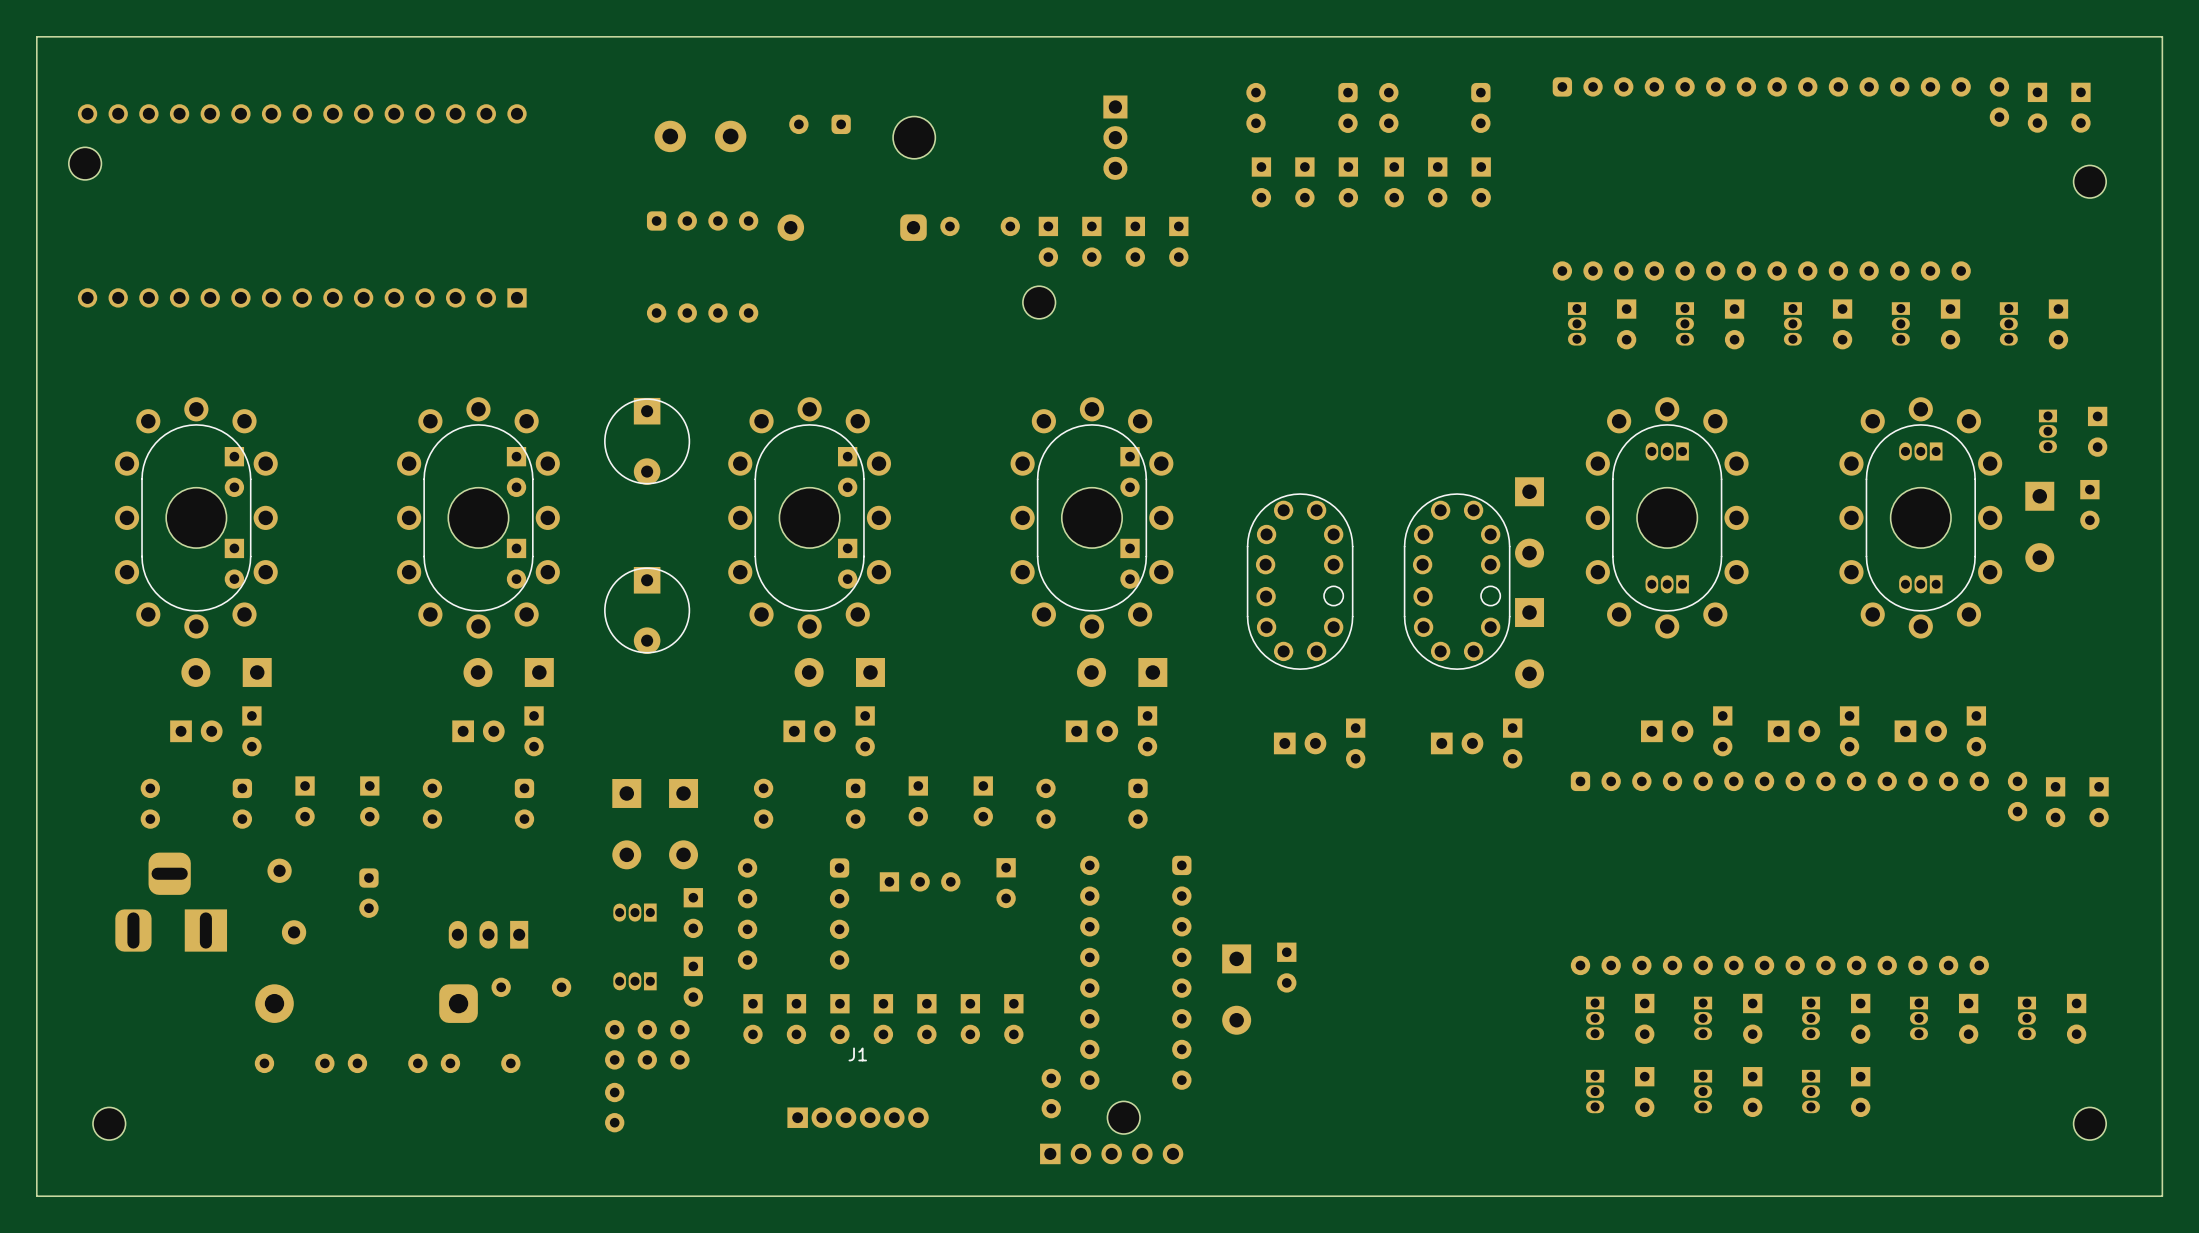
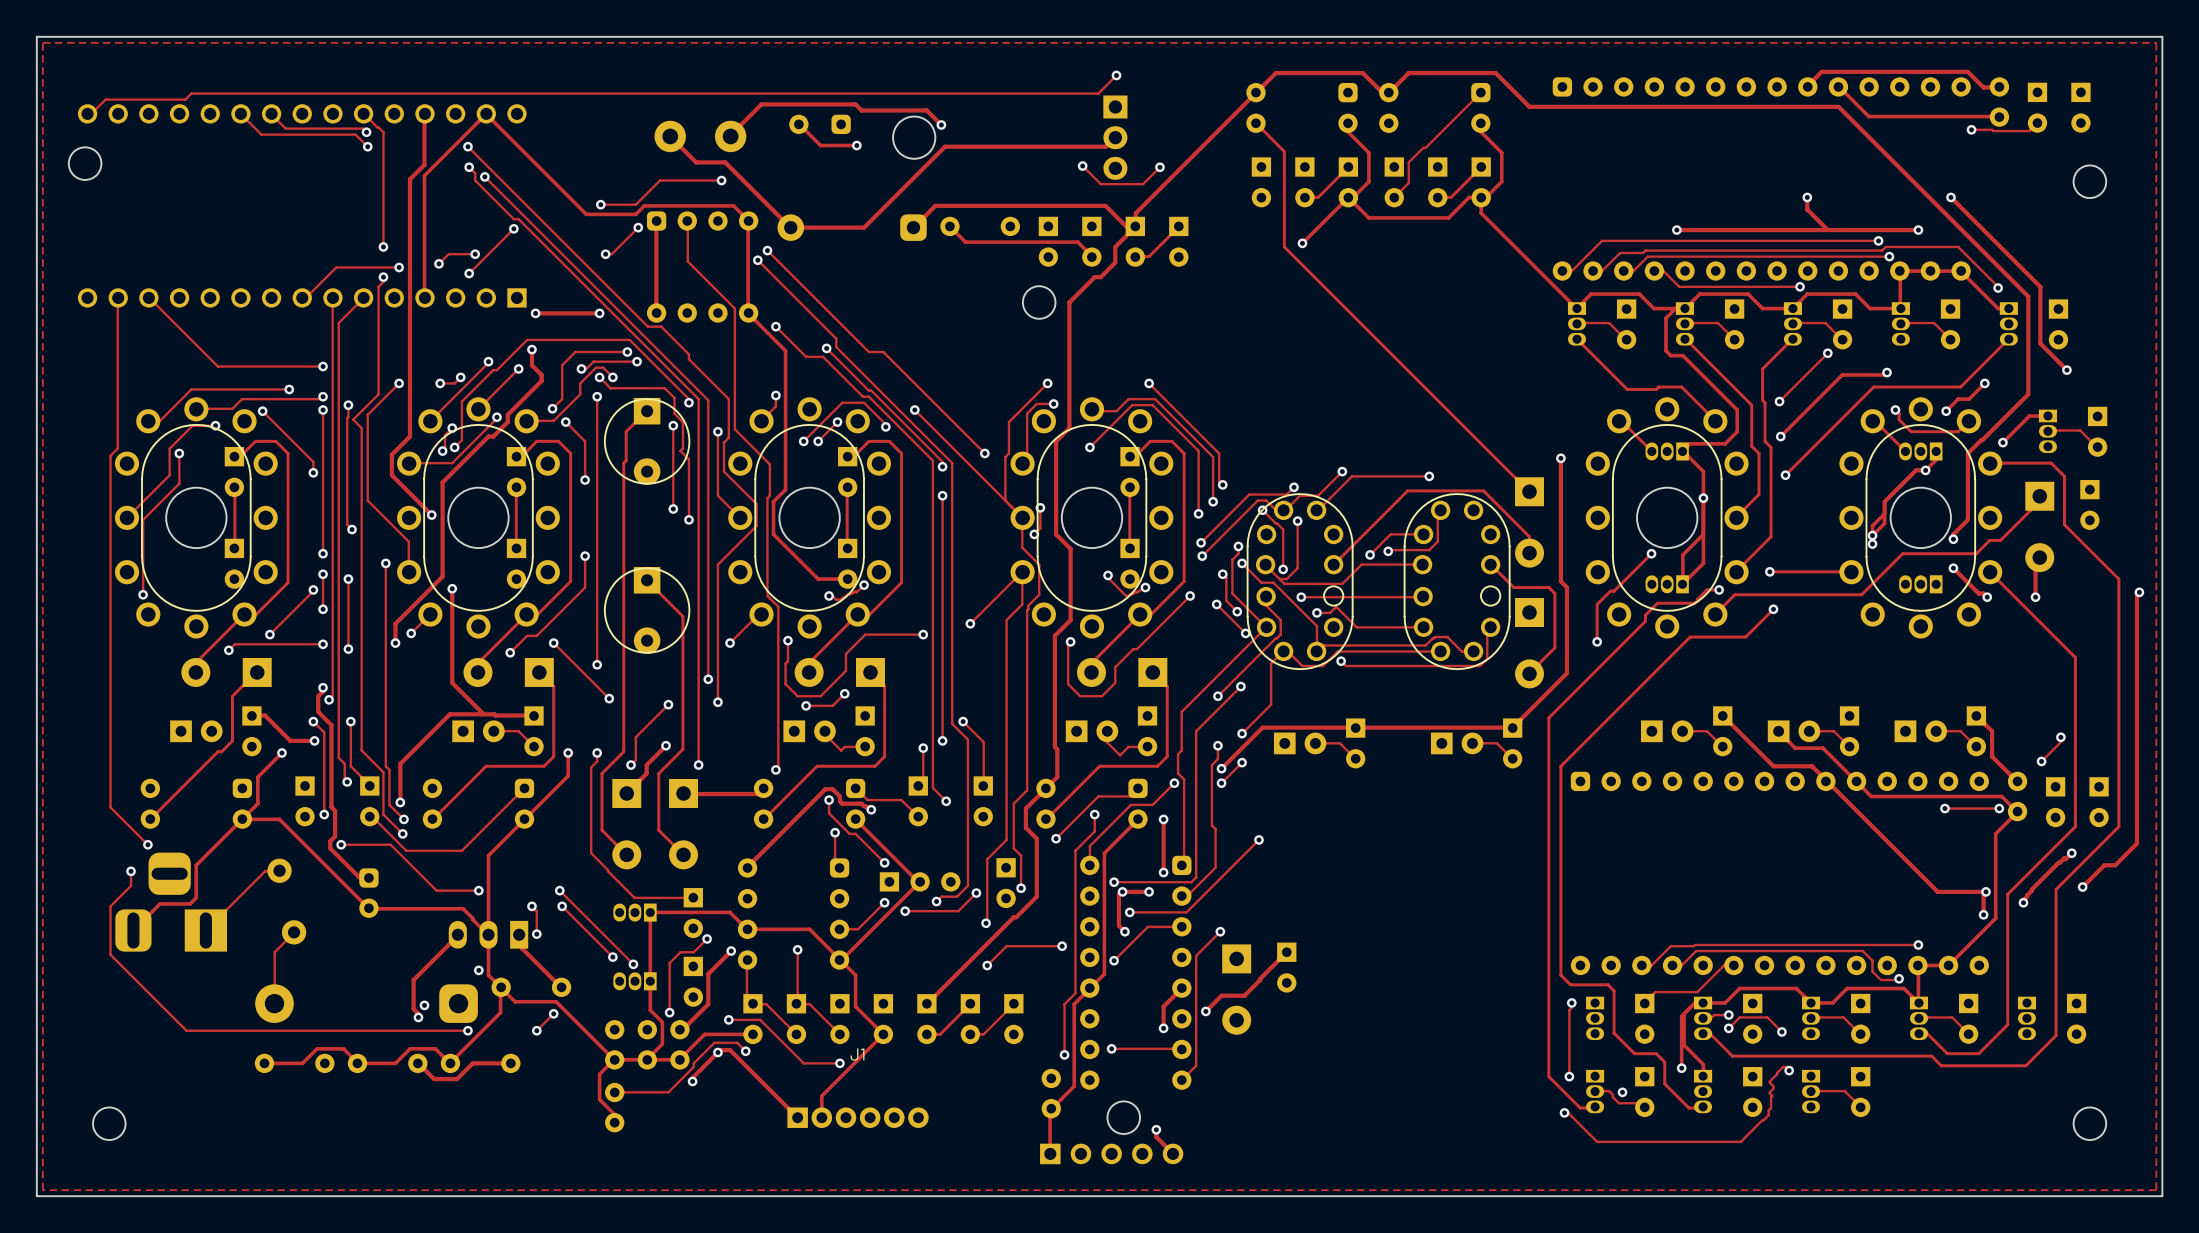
zone outline: none -> (42, 42) (2156, 42) (2156, 1190) (42, 1190) (42, 42)
track: none -> (1116, 75) (1098, 93) (191, 93) (185, 99) (105, 99) (91, 114) (87, 113)
via: none -> (1116, 75)
track: none -> (1807, 86) (1821, 71) (1967, 71) (1983, 87) (1999, 86)
track: none -> (1838, 86) (1868, 116) (1999, 117)
track: none -> (1480, 92) (1408, 162) (1408, 182) (1394, 197)
track: none -> (240, 113) (261, 134) (355, 134) (367, 146)
track: none -> (271, 113) (285, 128) (362, 128) (366, 132)
track: none -> (363, 113) (383, 132) (383, 246)
track: none -> (424, 113) (424, 164) (410, 179) (410, 436) (391, 454) (391, 475) (431, 515)
track: none -> (486, 113) (424, 175) (424, 297)
track: none -> (486, 114) (586, 214) (635, 214) (644, 205) (733, 205) (742, 214) (748, 220) (748, 313) (785, 350) (785, 489) (773, 501) (773, 534) (818, 579) (847, 579)
track: none -> (1255, 123) (1284, 151) (1284, 246) (1529, 491)
track: none -> (1348, 123) (1348, 132) (1368, 152) (1368, 181) (1356, 193) (1348, 197) (1368, 217) (1448, 217) (1469, 197) (1481, 197) (1481, 213) (1576, 308) (1591, 294) (1639, 294) (1653, 308) (1685, 308)
track: none -> (1480, 123) (1481, 132) (1501, 152) (1501, 181) (1489, 193) (1481, 197)
track: none -> (2037, 123) (2029, 131) (1971, 129)
track: none -> (798, 124) (820, 145) (856, 145)
track: none -> (941, 124) (926, 110) (861, 110) (855, 104) (761, 104) (730, 136)
via: none -> (941, 124)
via: none -> (1971, 129)
via: none -> (366, 132)
track: none -> (670, 136) (696, 162) (725, 162) (790, 227) (864, 227) (945, 146) (1105, 146) (1115, 137)
via: none -> (856, 145)
via: none -> (367, 146)
track: none -> (467, 146) (647, 326) (661, 326) (688, 354) (688, 359) (728, 399) (728, 437) (723, 442) (723, 471) (756, 504) (756, 525) (717, 564) (717, 702)
via: none -> (467, 146)
track: none -> (1082, 166) (1100, 184) (1143, 184) (1159, 167)
via: none -> (1082, 166)
track: none -> (469, 167) (475, 173) (475, 180) (513, 219) (518, 219) (698, 399) (698, 765)
via: none -> (469, 167)
via: none -> (1159, 167)
track: none -> (1348, 167) (1318, 197) (1304, 197)
track: none -> (1481, 167) (1451, 197) (1437, 197)
track: none -> (484, 176) (708, 400) (708, 679)
via: none -> (484, 176)
track: none -> (721, 180) (659, 180) (635, 204) (600, 204)
via: none -> (721, 180)
track: none -> (1348, 197) (1302, 243)
track: none -> (1807, 197) (1807, 209) (1826, 230)
via: none -> (1807, 197)
track: none -> (1951, 197) (2040, 286) (2040, 343) (2066, 370)
via: none -> (1951, 197)
via: none -> (600, 204)
track: none -> (656, 220) (656, 313)
track: none -> (687, 220) (687, 261) (734, 308) (734, 429) (769, 464) (769, 495) (767, 498) (767, 595) (778, 606) (778, 767) (775, 769)
track: none -> (949, 226) (965, 242) (1077, 242) (1091, 257)
track: none -> (1135, 226) (1126, 226) (1105, 205) (935, 205) (913, 227)
track: none -> (1178, 226) (1149, 256) (1135, 257)
track: none -> (638, 227) (611, 254) (605, 254)
via: none -> (638, 227)
track: none -> (513, 228) (469, 273)
via: none -> (513, 228)
track: none -> (1676, 230) (1918, 230)
via: none -> (1676, 230)
via: none -> (1918, 230)
track: none -> (1878, 240) (1601, 240) (1571, 271) (1562, 270)
via: none -> (1878, 240)
via: none -> (1302, 243)
via: none -> (383, 246)
track: none -> (767, 250) (868, 352) (883, 352) (984, 453)
via: none -> (767, 250)
track: none -> (475, 254) (448, 254) (438, 263)
via: none -> (475, 254)
via: none -> (605, 254)
track: none -> (1889, 256) (1647, 256) (1633, 271) (1623, 271)
via: none -> (1889, 256)
track: none -> (757, 260) (836, 338) (836, 347) (952, 463) (952, 723) (967, 739) (967, 885) (957, 896) (941, 896) (936, 901)
via: none -> (757, 260)
via: none -> (438, 263)
track: none -> (399, 267) (336, 267) (306, 297) (302, 297)
via: none -> (399, 267)
track: none -> (1593, 270) (1601, 271) (1620, 253) (1643, 253) (1645, 250) (1882, 250) (1885, 246) (1958, 246) (1998, 288)
track: none -> (1654, 270) (1663, 271) (1679, 286) (1800, 286)
track: none -> (1930, 270) (1961, 270) (1998, 308) (2008, 308)
track: none -> (1930, 271) (1899, 270) (1900, 308) (1870, 308) (1855, 294) (1807, 294) (1792, 308) (1762, 308) (1748, 294) (1699, 294) (1684, 308) (1676, 307) (1665, 318) (1665, 350) (1670, 355) (1682, 355) (1737, 410) (1737, 431) (1725, 443) (1690, 443) (1682, 451) (1703, 471) (1703, 563) (1682, 584) (1682, 554) (1703, 534)
via: none -> (469, 273)
track: none -> (383, 277) (383, 281) (378, 286) (378, 394) (353, 419) (361, 428) (361, 750) (383, 772) (383, 814) (402, 833)
via: none -> (383, 277)
via: none -> (1800, 286)
via: none -> (1998, 288)
track: none -> (118, 297) (117, 448) (110, 455) (110, 807) (147, 844)
track: none -> (148, 297) (217, 366) (323, 366)
track: none -> (332, 297) (332, 696) (329, 699)
track: none -> (363, 297) (338, 323) (338, 757) (344, 763) (344, 779) (347, 781)
track: none -> (535, 313) (599, 313)
via: none -> (535, 313)
via: none -> (599, 313)
track: none -> (1576, 323) (1609, 323) (1626, 339)
track: none -> (1684, 323) (1717, 323) (1734, 339)
track: none -> (1792, 323) (1825, 323) (1842, 339)
track: none -> (1900, 323) (1934, 323) (1950, 339)
track: none -> (775, 326) (806, 356) (823, 356) (862, 396) (868, 396) (932, 460) (932, 788) (946, 801)
via: none -> (775, 326)
track: none -> (1576, 339) (1627, 389) (1681, 387) (1715, 421)
track: none -> (1684, 339) (1751, 405) (1751, 446) (1758, 453) (1758, 494) (1736, 517)
track: none -> (1792, 339) (1762, 368) (1765, 441) (1771, 447) (1771, 536) (1736, 572)
track: none -> (2008, 339) (1960, 387) (1873, 387) (1785, 475)
track: none -> (826, 348) (942, 461) (942, 466)
via: none -> (826, 348)
track: none -> (531, 349) (531, 365) (541, 374) (541, 381) (507, 414) (507, 422) (493, 436) (488, 436) (442, 482) (442, 576) (395, 623) (395, 643)
via: none -> (531, 349)
track: none -> (627, 352) (575, 352) (562, 365) (562, 399) (552, 408)
via: none -> (627, 352)
track: none -> (1827, 353) (1779, 401)
via: none -> (1827, 353)
track: none -> (488, 361) (430, 421)
via: none -> (488, 361)
track: none -> (637, 361) (593, 361) (586, 368) (581, 368)
via: none -> (637, 361)
via: none -> (323, 366)
track: none -> (518, 368) (478, 409)
via: none -> (518, 368)
via: none -> (581, 368)
via: none -> (2066, 370)
track: none -> (1887, 372) (1884, 374) (1842, 374) (1780, 436)
via: none -> (1887, 372)
track: none -> (460, 377) (454, 383) (440, 383)
via: none -> (460, 377)
track: none -> (599, 377) (610, 388) (664, 388) (674, 397) (674, 413) (682, 422) (682, 448) (680, 451) (688, 459) (688, 519)
via: none -> (599, 377)
track: none -> (612, 377) (603, 367) (595, 367) (580, 383) (580, 394) (553, 420) (526, 421)
via: none -> (612, 377)
track: none -> (399, 383) (367, 414) (367, 500) (408, 541) (409, 572)
via: none -> (399, 383)
via: none -> (440, 383)
track: none -> (1047, 383) (1009, 422) (1009, 453) (1005, 457) (1005, 500)
via: none -> (1047, 383)
track: none -> (1149, 383) (1219, 453) (1219, 481) (1222, 484)
via: none -> (1149, 383)
track: none -> (1984, 383) (1969, 399) (1958, 399) (1946, 411)
via: none -> (1984, 383)
track: none -> (289, 389) (191, 389) (160, 420) (148, 421)
via: none -> (289, 389)
track: none -> (775, 395) (775, 406) (761, 421)
via: none -> (775, 395)
track: none -> (323, 396) (320, 399) (242, 399) (232, 408) (196, 409)
via: none -> (323, 396)
track: none -> (597, 396) (597, 664)
via: none -> (597, 396)
via: none -> (1779, 401)
track: none -> (688, 402) (688, 399) (629, 339) (527, 339) (461, 401) (461, 440) (454, 447)
via: none -> (688, 402)
track: none -> (1053, 403) (1036, 403) (1027, 413) (1027, 458) (1022, 463)
via: none -> (1053, 403)
track: none -> (348, 405) (347, 524) (352, 529)
via: none -> (348, 405)
via: none -> (552, 408)
track: none -> (1091, 409) (1094, 411) (1116, 411) (1128, 399) (1155, 399) (1213, 457) (1213, 501)
track: none -> (323, 410) (323, 553)
via: none -> (323, 410)
track: none -> (914, 410) (1015, 510) (1022, 517) (1022, 547) (1039, 564) (1039, 594) (1028, 605) (1027, 610) (1027, 790) (1013, 803) (1013, 848) (1021, 855) (1021, 888)
via: none -> (914, 410)
track: none -> (1895, 410) (1899, 413) (1899, 419) (1911, 431) (1958, 431) (1968, 421)
via: none -> (1895, 410)
track: none -> (262, 411) (313, 461) (313, 472)
via: none -> (262, 411)
track: none -> (647, 411) (626, 431) (626, 460) (623, 463) (623, 751) (602, 773) (602, 830) (626, 854)
via: none -> (1946, 411)
track: none -> (2047, 415) (2029, 416) (2002, 442)
track: none -> (496, 417) (452, 463) (409, 463)
via: none -> (496, 417)
track: none -> (1619, 421) (1651, 451)
track: none -> (1872, 421) (1905, 451)
track: none -> (565, 422) (585, 441) (585, 480)
via: none -> (565, 422)
track: none -> (837, 422) (818, 441)
via: none -> (837, 422)
track: none -> (215, 425) (192, 425) (169, 448) (169, 475) (127, 517)
via: none -> (215, 425)
track: none -> (673, 425) (673, 509)
via: none -> (673, 425)
track: none -> (885, 426) (885, 424) (864, 402) (842, 402) (803, 441)
via: none -> (885, 426)
track: none -> (452, 428) (445, 435) (445, 448) (442, 451)
via: none -> (452, 428)
track: none -> (717, 431) (717, 495) (740, 517)
via: none -> (717, 431)
track: none -> (2047, 431) (2080, 430) (2097, 447)
via: none -> (1780, 436)
via: none -> (803, 441)
via: none -> (818, 441)
via: none -> (2002, 442)
via: none -> (454, 447)
track: none -> (1089, 447) (1132, 405) (1152, 405) (1198, 451) (1198, 513)
via: none -> (1089, 447)
via: none -> (442, 451)
track: none -> (1936, 451) (1936, 459) (1925, 470) (1915, 470) (1884, 501) (1884, 523) (1872, 535)
track: none -> (179, 453) (179, 483) (143, 519) (143, 594)
via: none -> (179, 453)
via: none -> (984, 453)
track: none -> (234, 456) (239, 457) (255, 441) (275, 441) (288, 453) (288, 582) (255, 615) (244, 614) (199, 658) (195, 672)
track: none -> (516, 456) (521, 457) (536, 441) (558, 441) (570, 453) (570, 581) (538, 614) (526, 614) (482, 658) (477, 672)
track: none -> (847, 456) (853, 457) (868, 441) (889, 441) (901, 453) (901, 582) (868, 615) (858, 614) (813, 658) (809, 672)
track: none -> (1130, 456) (1134, 457) (1150, 441) (1172, 441) (1184, 453) (1184, 581) (1151, 614) (1140, 614) (1095, 658) (1091, 672)
track: none -> (1560, 458) (1560, 581) (1566, 587) (1566, 673) (1512, 728) (1262, 727) (1221, 768)
via: none -> (1560, 458)
track: none -> (1990, 463) (2051, 463) (2064, 476) (2064, 524) (2118, 579) (2118, 826) (2056, 889) (2056, 1035) (2025, 1065) (1941, 1065) (1931, 1056) (1732, 1056) (1709, 1033) (1703, 1033)
via: none -> (942, 466)
via: none -> (1925, 470)
track: none -> (1342, 471) (1318, 495) (1300, 495) (1283, 510) (1275, 510) (1266, 500) (1257, 500) (1202, 556)
via: none -> (1342, 471)
via: none -> (313, 472)
via: none -> (1785, 475)
track: none -> (1429, 476) (1351, 476) (1316, 510)
via: none -> (1429, 476)
via: none -> (585, 480)
via: none -> (1222, 484)
track: none -> (234, 487) (234, 548)
track: none -> (516, 487) (516, 548)
track: none -> (847, 487) (847, 548)
track: none -> (1130, 487) (1130, 548)
track: none -> (1294, 487) (1286, 494) (1249, 494) (1201, 542)
via: none -> (1294, 487)
track: none -> (942, 495) (942, 740)
via: none -> (942, 495)
track: none -> (2039, 496) (2030, 510) (2000, 540) (1989, 540) (1976, 553) (1902, 553) (1861, 594) (1734, 594) (1715, 614)
via: none -> (1703, 498)
via: none -> (1213, 501)
track: none -> (1040, 507) (1040, 528) (1034, 534)
via: none -> (1040, 507)
via: none -> (673, 509)
track: none -> (1262, 510) (1283, 529) (1283, 569)
via: none -> (1262, 510)
track: none -> (1440, 510) (1437, 512) (1437, 541) (1429, 550) (1388, 551)
via: none -> (1198, 513)
track: none -> (1884, 513) (1872, 525) (1872, 544)
via: none -> (431, 515)
via: none -> (688, 519)
track: none -> (1297, 521) (1297, 568) (1286, 579) (1280, 579)
via: none -> (1297, 521)
via: none -> (352, 529)
via: none -> (1034, 534)
track: none -> (1423, 534) (1390, 534) (1370, 554)
via: none -> (1872, 535)
track: none -> (1953, 539) (1953, 534) (1967, 519) (1967, 453) (2028, 394) (2028, 296) (1838, 106) (1529, 106) (1495, 73) (1408, 73) (1395, 86) (1388, 92) (1382, 92) (1362, 73) (1275, 73) (1135, 213) (1135, 226) (1115, 246) (1115, 262) (1100, 277) (1094, 277) (1069, 302) (1069, 428) (1056, 441) (1056, 534) (1070, 548) (1070, 620) (1054, 635) (1054, 746) (1057, 749) (1057, 777) (1025, 808) (1025, 827) (1036, 838) (1036, 896) (926, 1003)
via: none -> (1953, 539)
via: none -> (1201, 542)
via: none -> (1872, 544)
track: none -> (1238, 546) (1238, 553) (1232, 559) (1232, 593) (1266, 627) (1181, 711) (1181, 750) (1178, 754) (1178, 773) (1184, 779) (1184, 856) (1181, 865)
via: none -> (1238, 546)
via: none -> (1388, 551)
via: none -> (323, 553)
track: none -> (1529, 553) (1529, 536) (1483, 490) (1407, 490) (1333, 564)
track: none -> (1651, 553) (1614, 591) (1610, 591) (1597, 604) (1597, 641)
via: none -> (1651, 553)
via: none -> (1370, 554)
track: none -> (585, 556) (585, 587) (536, 635) (527, 635) (510, 652)
via: none -> (585, 556)
via: none -> (1202, 556)
track: none -> (2039, 557) (2035, 560) (2035, 597)
track: none -> (385, 563) (385, 766) (389, 769) (389, 804) (403, 819)
via: none -> (385, 563)
track: none -> (1242, 563) (1261, 582) (1273, 582) (1316, 626) (1316, 651) (1324, 645) (1425, 645) (1435, 637) (1447, 637) (1461, 651) (1473, 651)
via: none -> (1242, 563)
track: none -> (1265, 564) (1284, 583) (1342, 583) (1361, 564) (1422, 564)
track: none -> (1490, 564) (1513, 587) (1548, 587) (1554, 593) (1554, 647) (1529, 673)
track: none -> (1953, 568) (1978, 593) (1983, 593) (1987, 597)
via: none -> (1953, 568)
via: none -> (1283, 569)
track: none -> (1769, 571) (1851, 572)
via: none -> (1769, 571)
track: none -> (1990, 572) (2075, 657) (2075, 826) (2007, 894) (2007, 1024) (1978, 1053) (1947, 1053) (1926, 1033) (1919, 1033)
track: none -> (323, 574) (323, 609)
via: none -> (323, 574)
track: none -> (1222, 574) (1226, 577) (1226, 600) (1237, 611)
via: none -> (1222, 574)
track: none -> (1108, 575) (1108, 577) (1126, 595) (1139, 591) (1144, 586) (1145, 587)
via: none -> (1108, 575)
track: none -> (348, 579) (348, 649)
via: none -> (348, 579)
track: none -> (647, 580) (682, 616) (682, 749) (658, 773) (658, 830) (683, 854)
track: none -> (864, 585) (856, 592) (847, 594) (841, 599) (829, 595)
via: none -> (864, 585)
via: none -> (1145, 587)
track: none -> (452, 588) (452, 682) (482, 714)
via: none -> (452, 588)
track: none -> (313, 589) (269, 634)
via: none -> (313, 589)
track: none -> (1719, 589) (1707, 589) (1694, 603) (1657, 603) (1645, 615) (1645, 621) (1548, 717) (1548, 1076) (1580, 1108) (1595, 1106)
via: none -> (1719, 589)
track: none -> (2139, 592) (2136, 594) (2136, 843) (2115, 865) (2104, 865) (2082, 887)
via: none -> (2139, 592)
via: none -> (143, 594)
via: none -> (829, 595)
track: none -> (1190, 595) (1137, 649) (1133, 649) (1115, 667) (1115, 682) (1102, 696) (1080, 696) (1068, 684) (1068, 644) (1070, 641)
via: none -> (1190, 595)
track: none -> (1266, 596) (1266, 605) (1280, 620) (1280, 634) (1217, 696)
track: none -> (1423, 596) (1301, 597)
via: none -> (1301, 597)
via: none -> (1987, 597)
via: none -> (2035, 597)
track: none -> (1216, 604) (1245, 633)
via: none -> (1216, 604)
via: none -> (323, 609)
track: none -> (1773, 609) (1745, 637) (1690, 637) (1560, 766) (1560, 975) (1570, 984) (1608, 984) (1614, 990) (1614, 1033) (1634, 1053) (1656, 1053) (1664, 1062) (1664, 1083) (1688, 1108) (1703, 1106)
via: none -> (1773, 609)
via: none -> (1237, 611)
track: none -> (1316, 612) (1330, 612) (1336, 606) (1356, 627) (1423, 627)
via: none -> (1316, 612)
track: none -> (430, 614) (411, 633)
track: none -> (761, 614) (730, 643)
track: none -> (970, 623) (1022, 571) (1022, 604) (1006, 620) (1006, 839) (987, 859) (986, 923)
via: none -> (970, 623)
track: none -> (1490, 627) (1487, 631) (1487, 658) (1480, 666) (1345, 666) (1341, 661)
via: none -> (411, 633)
via: none -> (1245, 633)
via: none -> (269, 634)
track: none -> (923, 634) (865, 634) (845, 653) (845, 670) (820, 696) (797, 696) (785, 684) (788, 640)
via: none -> (923, 634)
via: none -> (788, 640)
via: none -> (1070, 641)
via: none -> (1597, 641)
via: none -> (395, 643)
track: none -> (553, 643) (609, 698)
via: none -> (553, 643)
via: none -> (730, 643)
track: none -> (323, 644) (234, 644) (228, 650)
via: none -> (323, 644)
via: none -> (348, 649)
via: none -> (228, 650)
track: none -> (1440, 651) (1337, 651) (1323, 666) (1302, 666) (1291, 655) (1283, 651) (1271, 663) (1271, 704) (1242, 733)
via: none -> (510, 652)
via: none -> (1341, 661)
via: none -> (597, 664)
track: none -> (257, 672) (232, 696) (232, 740) (221, 751) (217, 751) (150, 819)
track: none -> (539, 672) (553, 686) (553, 756) (544, 766) (486, 766) (432, 819)
track: none -> (870, 672) (884, 686) (884, 756) (874, 766) (816, 766) (763, 819)
track: none -> (1152, 672) (1167, 686) (1167, 756) (1157, 766) (1099, 766) (1045, 819)
via: none -> (708, 679)
track: none -> (1240, 686) (1196, 731) (1196, 877) (1191, 882) (1114, 882)
via: none -> (1240, 686)
track: none -> (323, 687) (323, 691) (318, 696) (318, 711) (331, 725) (331, 807) (335, 810) (335, 836) (330, 841) (330, 848) (359, 877) (368, 878)
via: none -> (323, 687)
track: none -> (844, 693) (832, 705) (806, 705)
via: none -> (844, 693)
via: none -> (1217, 696)
via: none -> (609, 698)
via: none -> (329, 699)
via: none -> (717, 702)
track: none -> (668, 704) (635, 737) (635, 760) (631, 765)
via: none -> (668, 704)
via: none -> (806, 705)
track: none -> (251, 715) (265, 715) (290, 740) (314, 740)
track: none -> (534, 715) (449, 714) (400, 763) (400, 802)
track: none -> (1722, 715) (1773, 766) (1812, 766) (1937, 891) (1986, 891) (1983, 895) (1983, 914)
track: none -> (1976, 715) (1992, 731) (1992, 756) (2017, 781)
track: none -> (313, 721) (324, 732) (324, 814)
via: none -> (313, 721)
track: none -> (350, 721) (350, 766) (369, 786)
via: none -> (350, 721)
track: none -> (963, 721) (983, 742) (983, 786)
via: none -> (963, 721)
track: none -> (493, 731) (518, 731) (534, 746)
track: none -> (824, 731) (841, 750) (844, 746) (865, 746)
track: none -> (1107, 731) (1106, 742) (1120, 755) (1128, 746) (1147, 746)
track: none -> (1682, 731) (1707, 731) (1722, 746)
track: none -> (1778, 731) (1795, 748) (1822, 748) (1871, 796) (2001, 796) (2017, 811) (1995, 833) (1995, 918) (1948, 965)
track: none -> (1809, 731) (1833, 731) (1849, 746)
track: none -> (1936, 731) (1960, 731) (1976, 746)
via: none -> (1242, 733)
track: none -> (2060, 737) (2060, 742) (2041, 761)
via: none -> (2060, 737)
via: none -> (314, 740)
via: none -> (942, 740)
track: none -> (1315, 743) (1339, 743) (1355, 758)
track: none -> (1472, 743) (1496, 743) (1512, 758)
track: none -> (666, 745) (646, 765) (646, 773) (626, 793)
via: none -> (666, 745)
track: none -> (1217, 745) (1217, 759) (1211, 765) (1211, 825) (1215, 829) (1215, 867) (1190, 893) (1181, 896)
via: none -> (1217, 745)
track: none -> (923, 748) (923, 777) (918, 786)
via: none -> (923, 748)
track: none -> (281, 752) (257, 777) (257, 803) (242, 819)
via: none -> (281, 752)
track: none -> (568, 752) (568, 775) (488, 855) (488, 975) (501, 987)
via: none -> (568, 752)
track: none -> (597, 752) (597, 761) (591, 767) (591, 853) (634, 897) (693, 897)
via: none -> (597, 752)
via: none -> (2041, 761)
track: none -> (1242, 762) (1221, 783)
via: none -> (1242, 762)
via: none -> (631, 765)
via: none -> (698, 765)
via: none -> (1221, 768)
via: none -> (775, 769)
via: none -> (347, 781)
track: none -> (1174, 783) (1152, 804) (1130, 804) (1089, 845) (1089, 865)
via: none -> (1174, 783)
via: none -> (1221, 783)
track: none -> (524, 788) (461, 850) (406, 850) (369, 816)
track: none -> (763, 788) (756, 794) (683, 793)
track: none -> (855, 788) (867, 800) (901, 800) (918, 816)
track: none -> (1137, 788) (1129, 796) (1098, 796) (1056, 838)
track: none -> (829, 800) (829, 813) (849, 833) (855, 833) (884, 862)
via: none -> (829, 800)
via: none -> (946, 801)
via: none -> (400, 802)
track: none -> (1944, 808) (1999, 808)
via: none -> (1944, 808)
via: none -> (1999, 808)
track: none -> (871, 809) (861, 803) (842, 803) (839, 801) (839, 796) (832, 789) (825, 789) (747, 868)
via: none -> (871, 809)
via: none -> (324, 814)
track: none -> (1094, 814) (1094, 831) (1075, 850) (1075, 993) (1064, 1004) (1064, 1054)
via: none -> (1094, 814)
track: none -> (242, 819) (196, 865) (196, 897) (190, 903) (160, 903) (133, 930)
track: none -> (242, 819) (279, 819) (368, 908) (463, 908) (488, 935)
via: none -> (403, 819)
track: none -> (855, 819) (920, 881) (839, 960)
track: none -> (1137, 819) (1104, 853) (1104, 973) (1074, 1004) (1074, 1086) (1051, 1108) (1050, 1153)
track: none -> (1163, 819) (1163, 872)
via: none -> (1163, 819)
track: none -> (835, 832) (835, 859) (839, 868)
via: none -> (835, 832)
via: none -> (402, 833)
via: none -> (1056, 838)
track: none -> (1259, 839) (1186, 912) (1129, 912)
via: none -> (1259, 839)
via: none -> (147, 844)
track: none -> (341, 844) (390, 844) (436, 890) (478, 890)
via: none -> (341, 844)
track: none -> (2071, 853) (2058, 862) (2031, 889) (2023, 902)
via: none -> (2071, 853)
via: none -> (884, 862)
track: none -> (279, 870) (265, 871) (205, 930)
track: none -> (131, 871) (131, 885) (110, 906) (110, 954) (186, 1030) (467, 1030)
via: none -> (131, 871)
via: none -> (1163, 872)
via: none -> (1114, 882)
via: none -> (2082, 887)
via: none -> (1021, 888)
via: none -> (478, 890)
track: none -> (559, 890) (633, 964)
via: none -> (559, 890)
via: none -> (1122, 891)
track: none -> (1149, 891) (1122, 891) (1118, 894) (1118, 925) (1124, 931)
via: none -> (1149, 891)
via: none -> (1986, 891)
track: none -> (976, 893) (958, 911) (905, 911)
via: none -> (976, 893)
via: none -> (936, 901)
track: none -> (884, 902) (858, 929) (839, 929)
via: none -> (884, 902)
via: none -> (2023, 902)
track: none -> (531, 906) (536, 911) (536, 934)
via: none -> (531, 906)
track: none -> (562, 906) (612, 957)
via: none -> (562, 906)
via: none -> (905, 911)
track: none -> (650, 912) (650, 1010) (662, 1022) (662, 1044) (647, 1059)
track: none -> (650, 912) (730, 912) (746, 929) (809, 929) (839, 960)
via: none -> (1129, 912)
via: none -> (1983, 914)
via: none -> (986, 923)
track: none -> (1181, 926) (1147, 926) (1114, 960)
via: none -> (1124, 931)
track: none -> (1220, 931) (1196, 955) (1196, 1065) (1181, 1080)
via: none -> (1220, 931)
track: none -> (294, 932) (274, 952) (274, 1003)
track: none -> (457, 934) (413, 980) (413, 1009) (418, 1013) (418, 1017)
track: none -> (519, 934) (522, 948) (561, 987)
via: none -> (536, 934)
track: none -> (707, 938) (693, 952) (680, 952) (669, 963) (669, 1012)
via: none -> (707, 938)
track: none -> (1918, 945) (1670, 946) (1651, 965) (1641, 965)
via: none -> (1918, 945)
track: none -> (1062, 946) (1006, 946) (987, 965)
via: none -> (1062, 946)
track: none -> (797, 949) (796, 1003) (809, 1004) (839, 1034)
via: none -> (797, 949)
track: none -> (731, 951) (708, 973) (708, 1004) (687, 1024) (679, 1029)
via: none -> (731, 951)
track: none -> (1286, 952) (1244, 995) (1221, 995) (1205, 1011)
via: none -> (612, 957)
track: none -> (747, 960) (746, 994) (752, 1003) (766, 1004) (796, 1034)
track: none -> (839, 960) (855, 975) (855, 1006) (883, 1034) (821, 1095) (821, 1117)
via: none -> (1114, 960)
via: none -> (633, 964)
via: none -> (987, 965)
track: none -> (1672, 965) (1681, 965) (1696, 951) (1862, 951) (1872, 960) (1872, 971) (1880, 980) (1899, 978)
track: none -> (1733, 965) (1723, 965) (1697, 992) (1655, 992) (1644, 1003)
track: none -> (1948, 965) (1917, 965) (1919, 1003) (1903, 988) (1847, 988) (1832, 1002) (1810, 1002)
via: none -> (478, 970)
via: none -> (1899, 978)
track: none -> (501, 987) (500, 1012) (450, 1063) (435, 1048) (410, 1048) (395, 1063) (357, 1063) (343, 1048) (317, 1048) (302, 1063) (264, 1063)
track: none -> (501, 987) (515, 1001) (556, 1001) (614, 1059)
track: none -> (1181, 988) (1163, 1006) (1163, 1028)
track: none -> (1571, 1002) (1571, 1007) (1569, 1010) (1569, 1076)
via: none -> (1571, 1002)
track: none -> (970, 1003) (940, 1034) (926, 1034)
track: none -> (1013, 1003) (983, 1034) (970, 1034)
track: none -> (1811, 1003) (1796, 988) (1739, 988) (1725, 1002) (1694, 1002) (1681, 1016) (1681, 1068)
via: none -> (424, 1005)
via: none -> (1205, 1011)
via: none -> (669, 1012)
track: none -> (553, 1013) (536, 1030)
via: none -> (553, 1013)
track: none -> (1684, 1013) (1684, 1045) (1703, 1064) (1703, 1076)
track: none -> (1728, 1015) (1714, 1015) (1710, 1018) (1703, 1018)
via: none -> (1728, 1015)
via: none -> (418, 1017)
track: none -> (1811, 1018) (1843, 1017) (1860, 1034)
track: none -> (1919, 1018) (1952, 1017) (1968, 1034)
track: none -> (728, 1019) (760, 1019) (803, 1063) (839, 1063)
via: none -> (728, 1019)
via: none -> (1163, 1028)
track: none -> (1728, 1028) (1739, 1017) (1767, 1017) (1781, 1031)
via: none -> (1728, 1028)
via: none -> (467, 1030)
via: none -> (536, 1030)
via: none -> (1781, 1031)
track: none -> (752, 1034) (704, 1034) (679, 1059) (647, 1059)
track: none -> (1111, 1048) (1181, 1049)
via: none -> (1111, 1048)
track: none -> (745, 1051) (737, 1042) (714, 1042) (668, 1092) (614, 1092)
via: none -> (745, 1051)
via: none -> (717, 1052)
via: none -> (1064, 1054)
track: none -> (614, 1059) (647, 1059)
track: none -> (614, 1059) (599, 1074) (599, 1099) (614, 1114) (614, 1122)
track: none -> (417, 1063) (434, 1079) (457, 1079) (472, 1063) (510, 1063)
via: none -> (839, 1063)
via: none -> (1681, 1068)
track: none -> (1789, 1070) (1783, 1066) (1769, 1081) (1773, 1088) (1769, 1092) (1772, 1095) (1768, 1115) (1740, 1141) (1597, 1141) (1568, 1112) (1564, 1112)
via: none -> (1789, 1070)
via: none -> (1569, 1076)
track: none -> (692, 1081) (692, 1077) (717, 1052) (721, 1050) (730, 1050) (797, 1117)
via: none -> (692, 1081)
track: none -> (1595, 1091) (1609, 1091) (1618, 1103) (1637, 1103) (1644, 1107)
track: none -> (1811, 1091) (1844, 1091) (1860, 1107)
via: none -> (1622, 1092)
via: none -> (1564, 1112)
track: none -> (1156, 1129) (1156, 1137) (1173, 1153)
via: none -> (1156, 1129)

